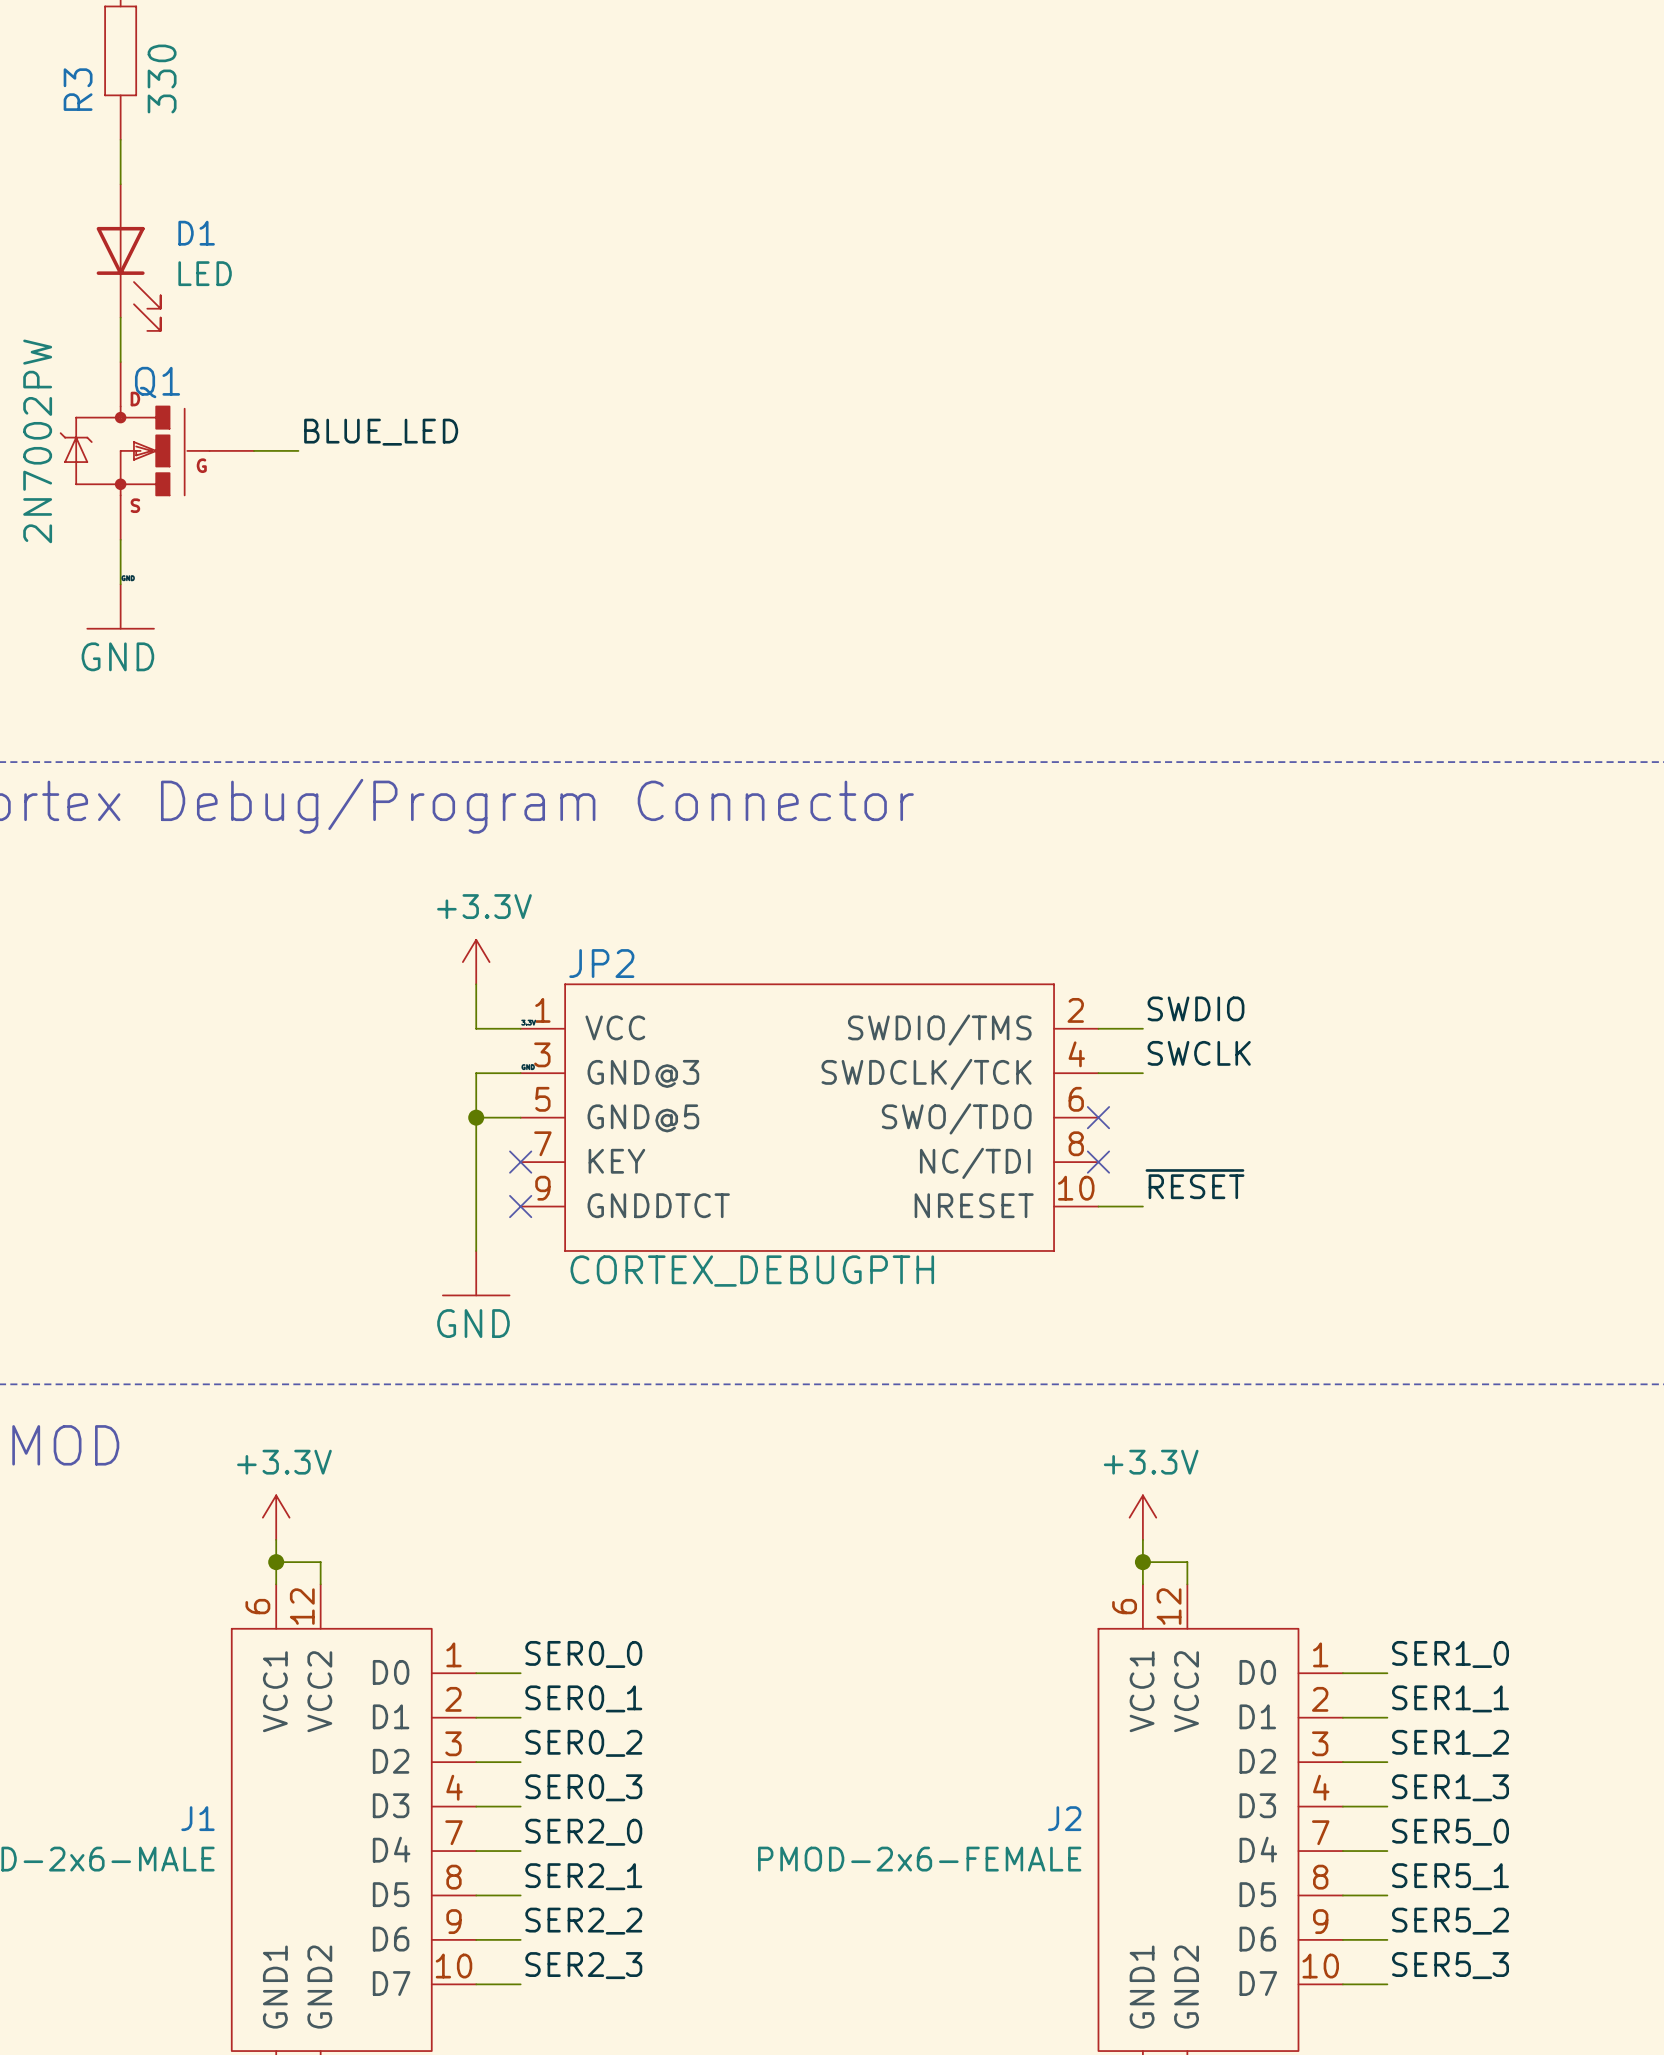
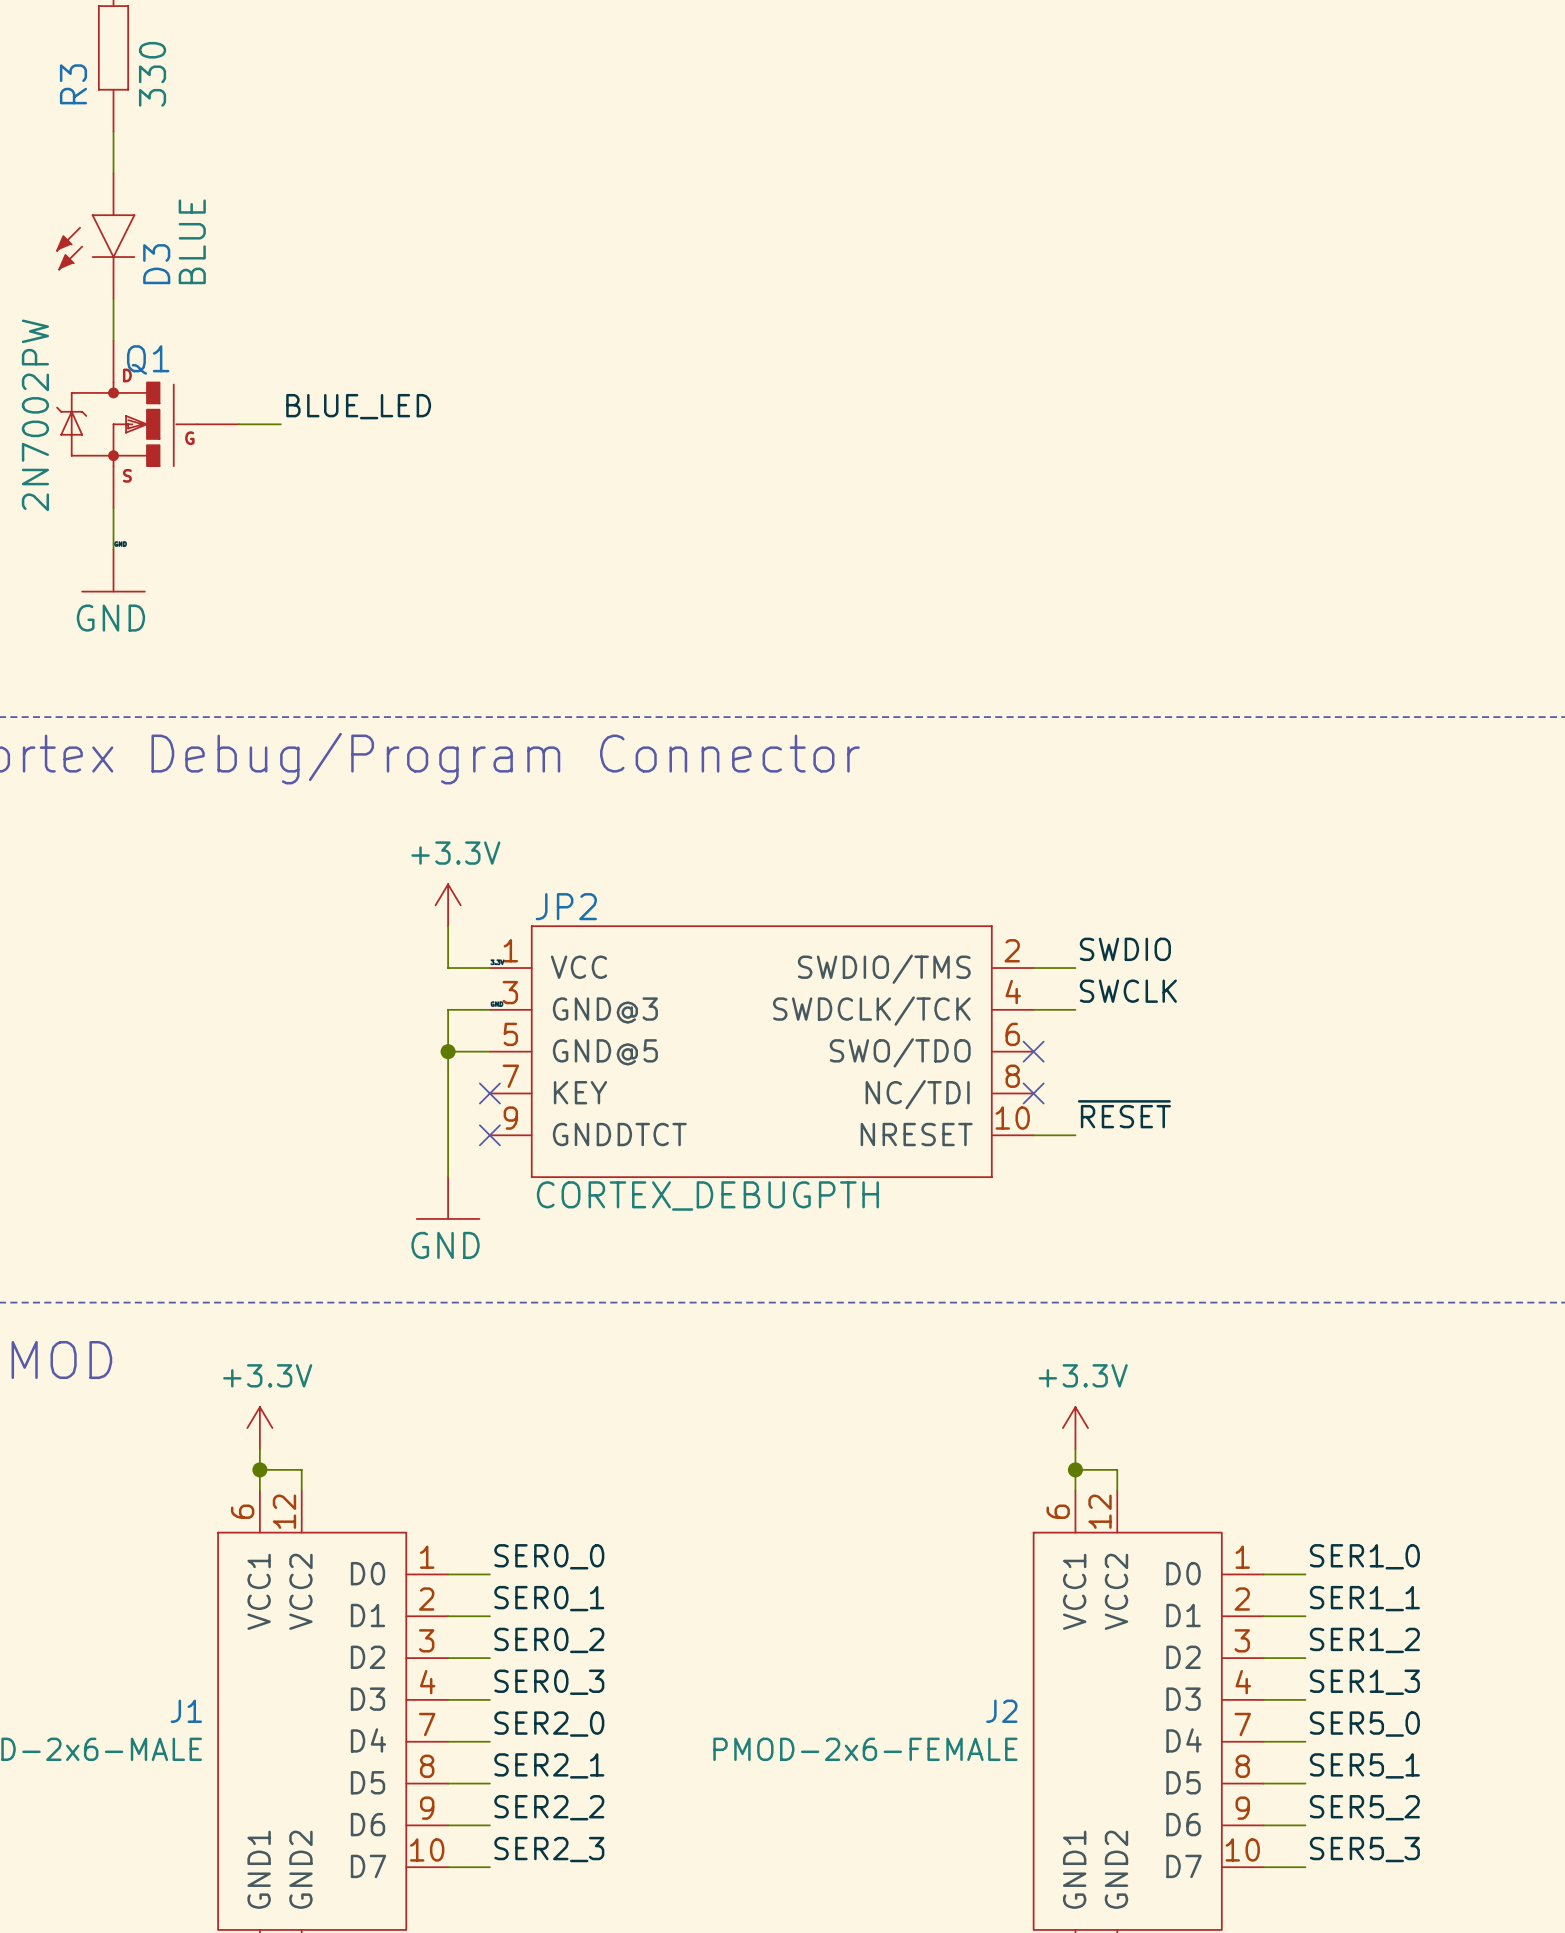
D3: none -> BLUE (95, 236)
D1: LED (128, 257) -> none

